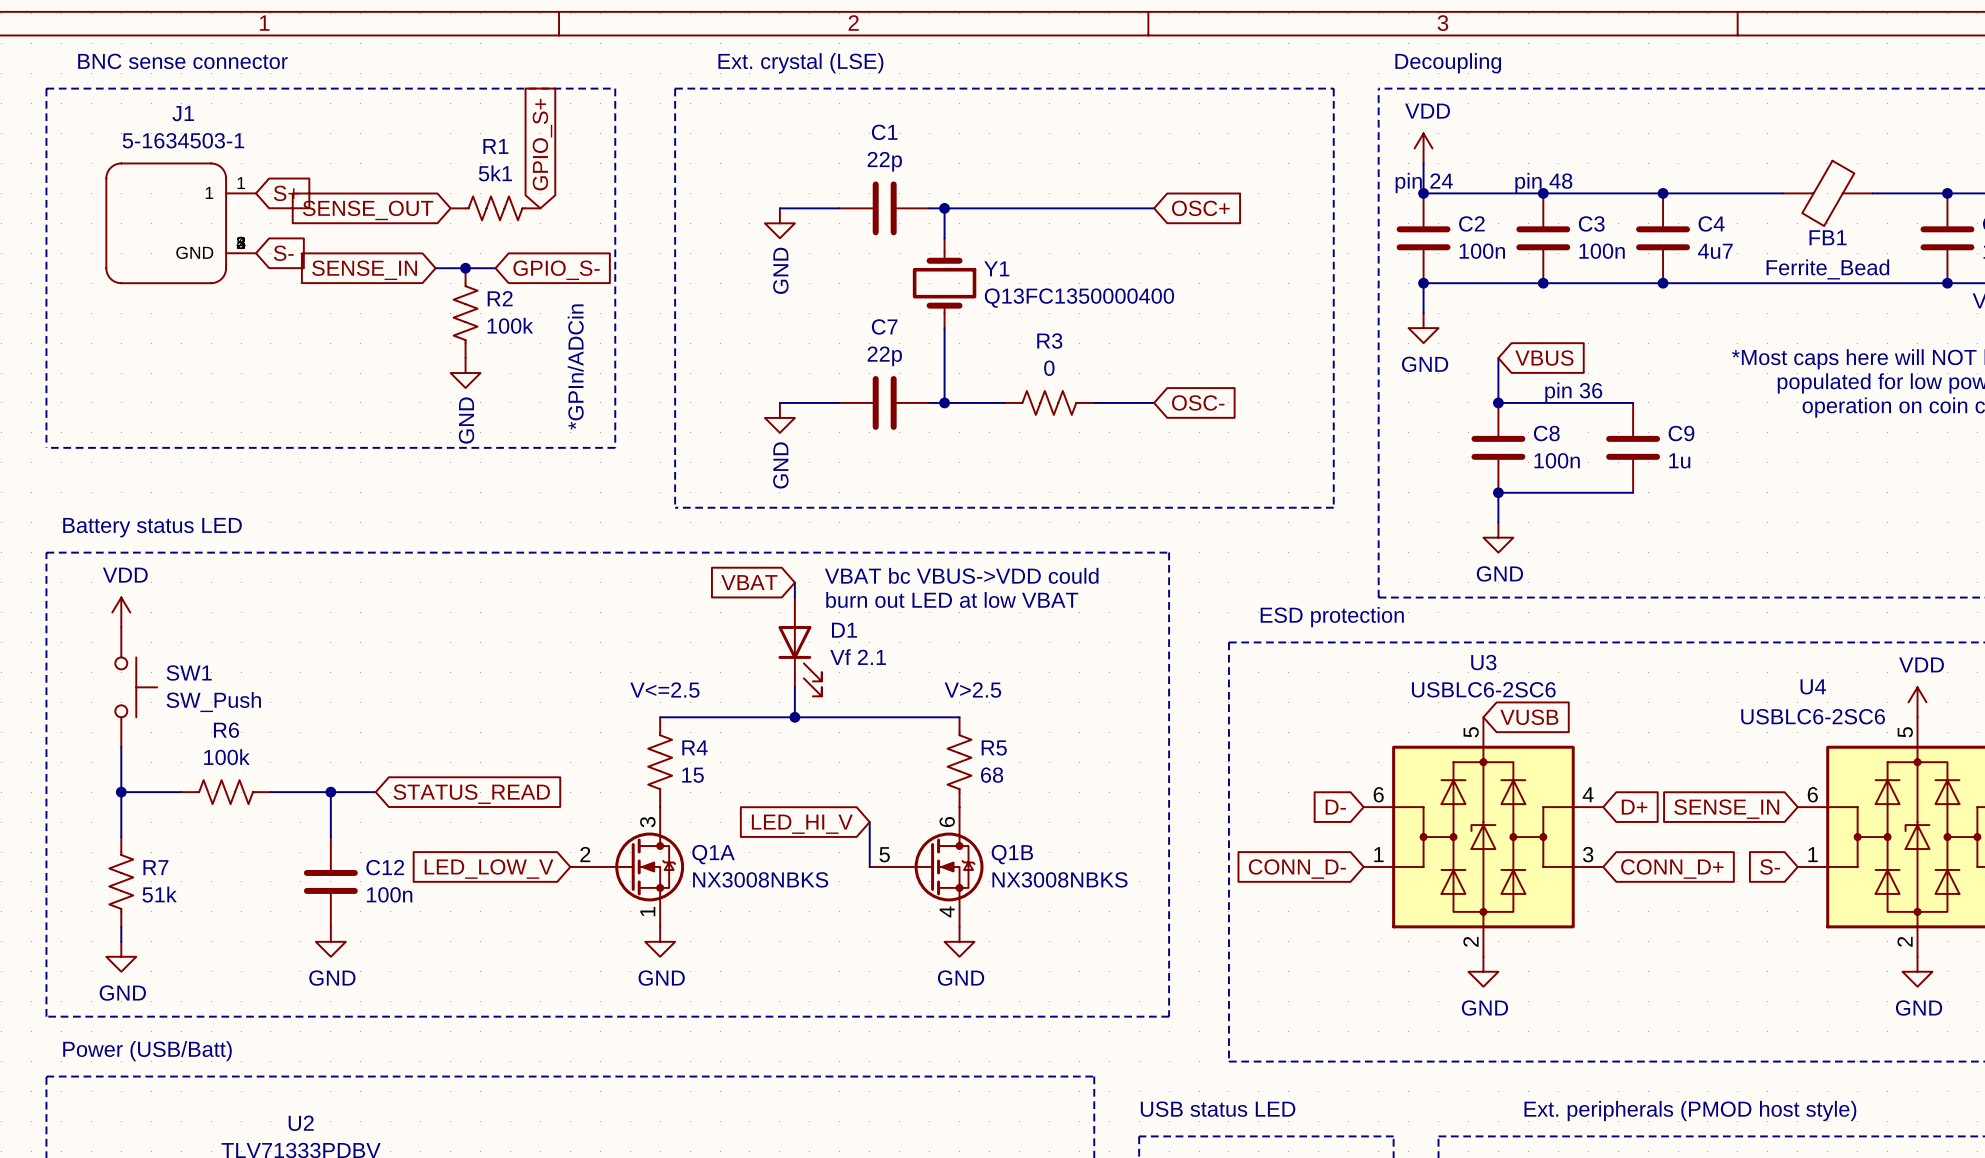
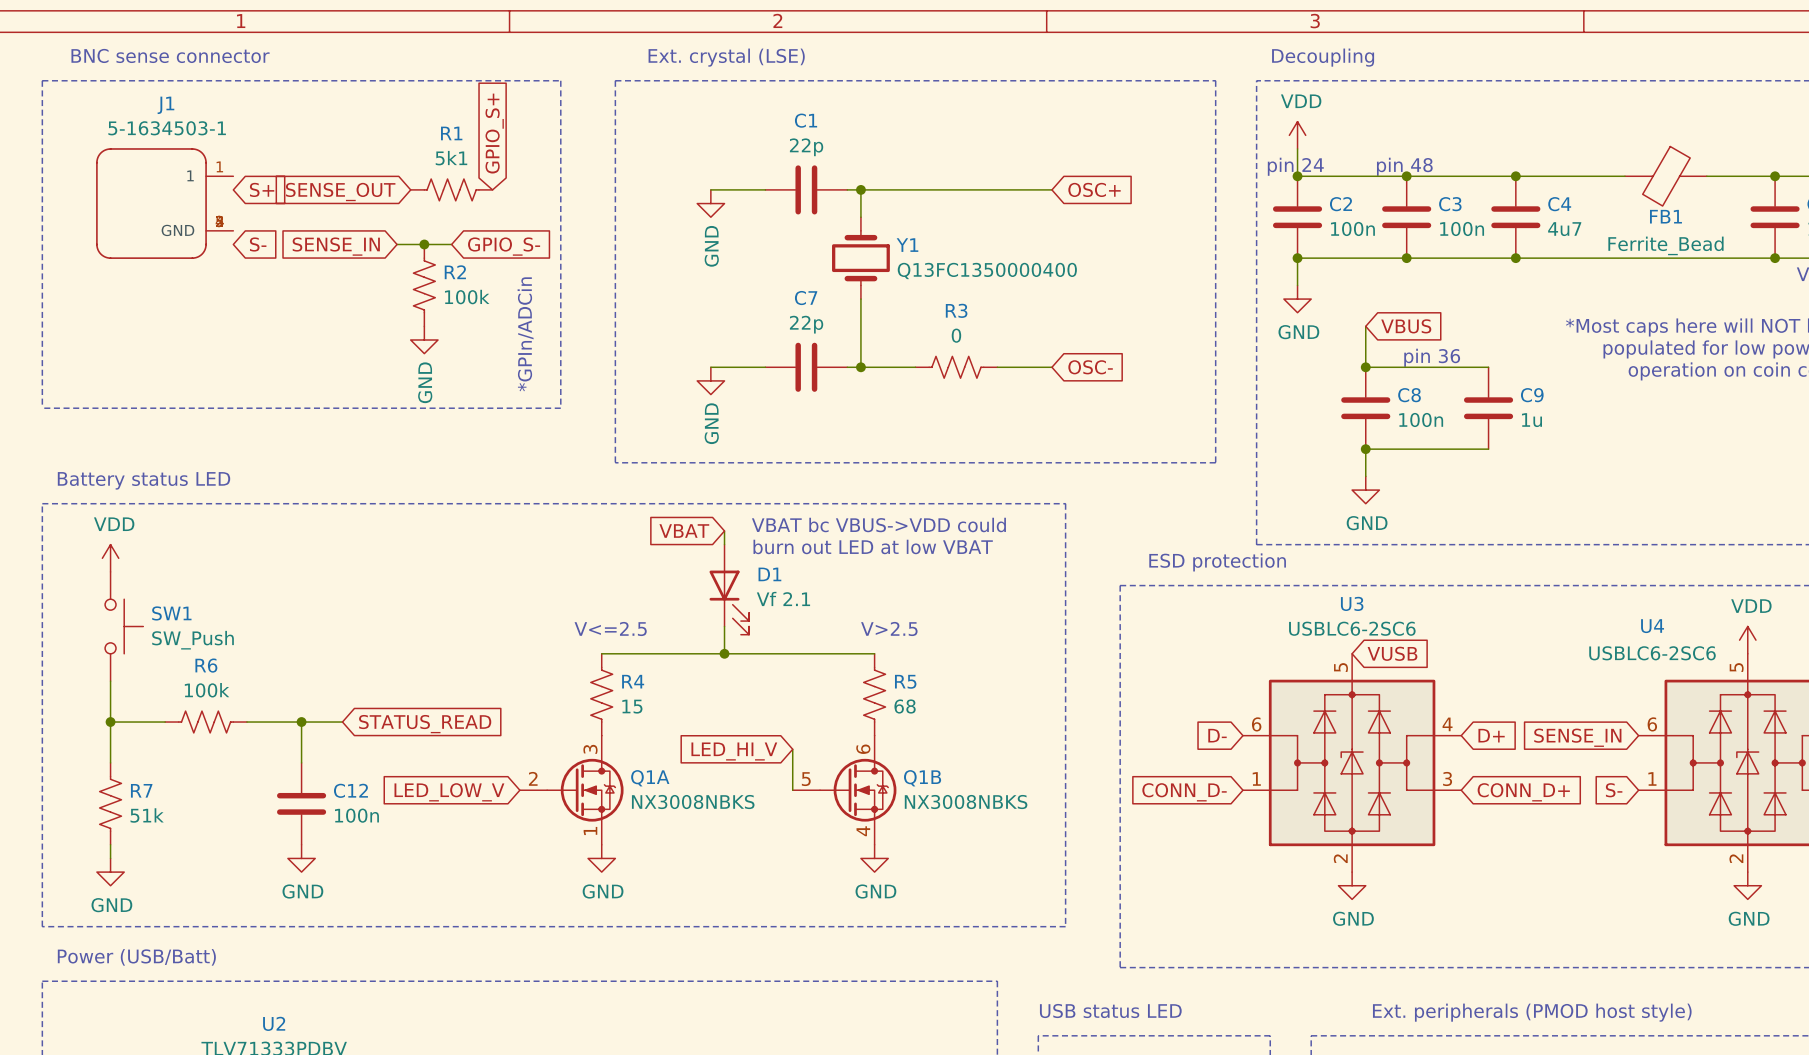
global label position: S+ (286, 193) -> S+ (262, 189)
global label position: S- (283, 253) -> S- (258, 244)

